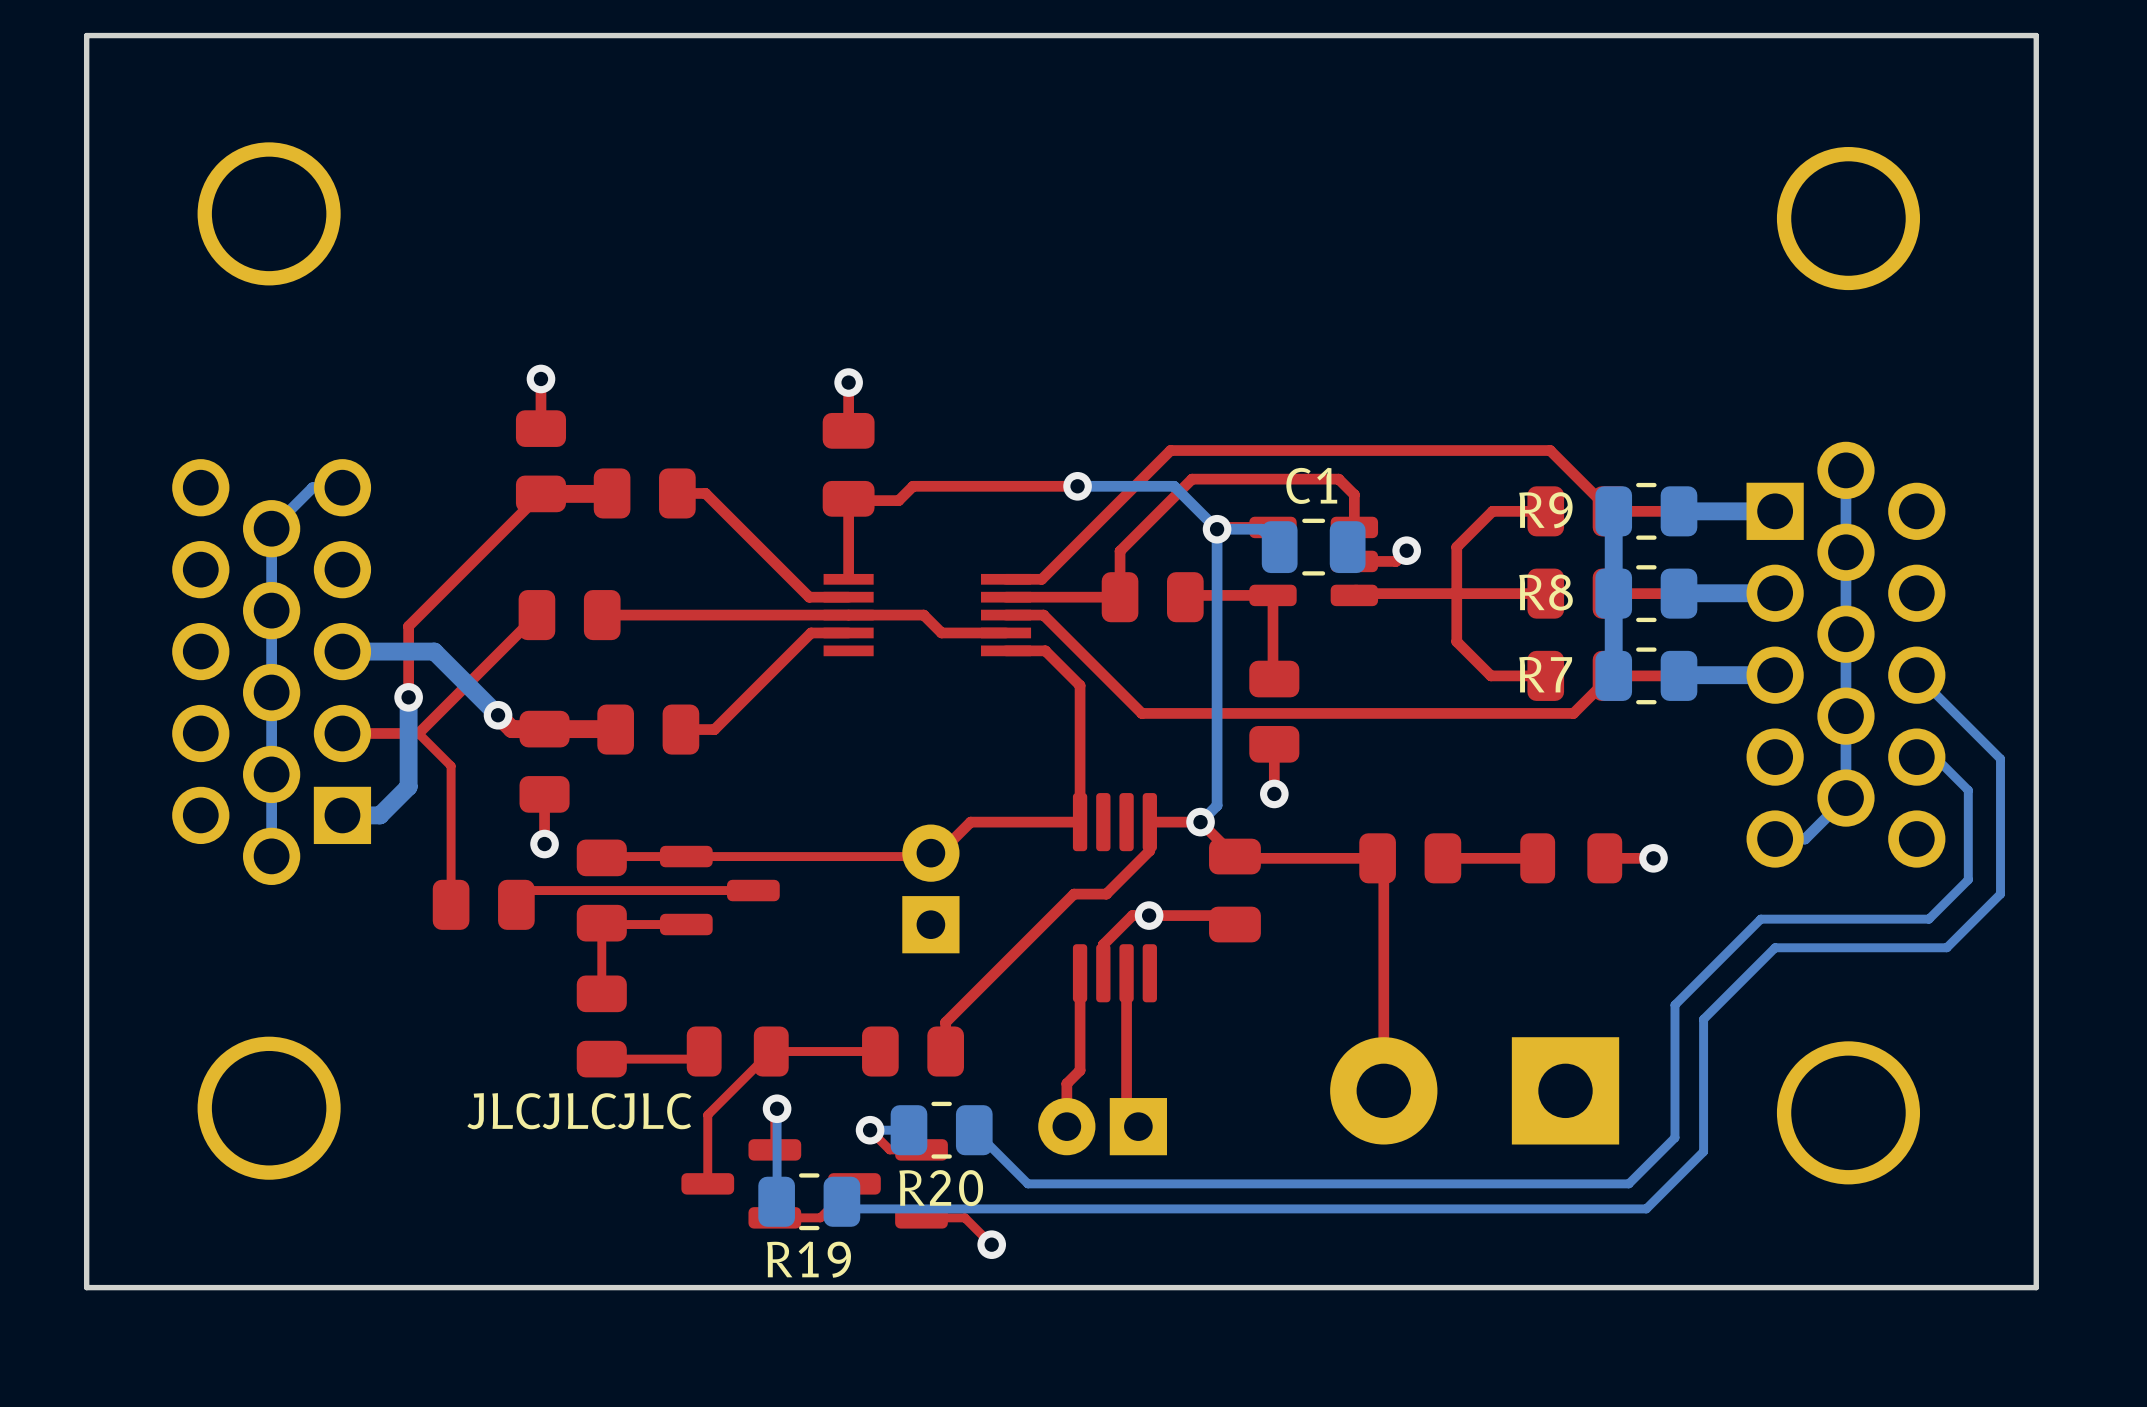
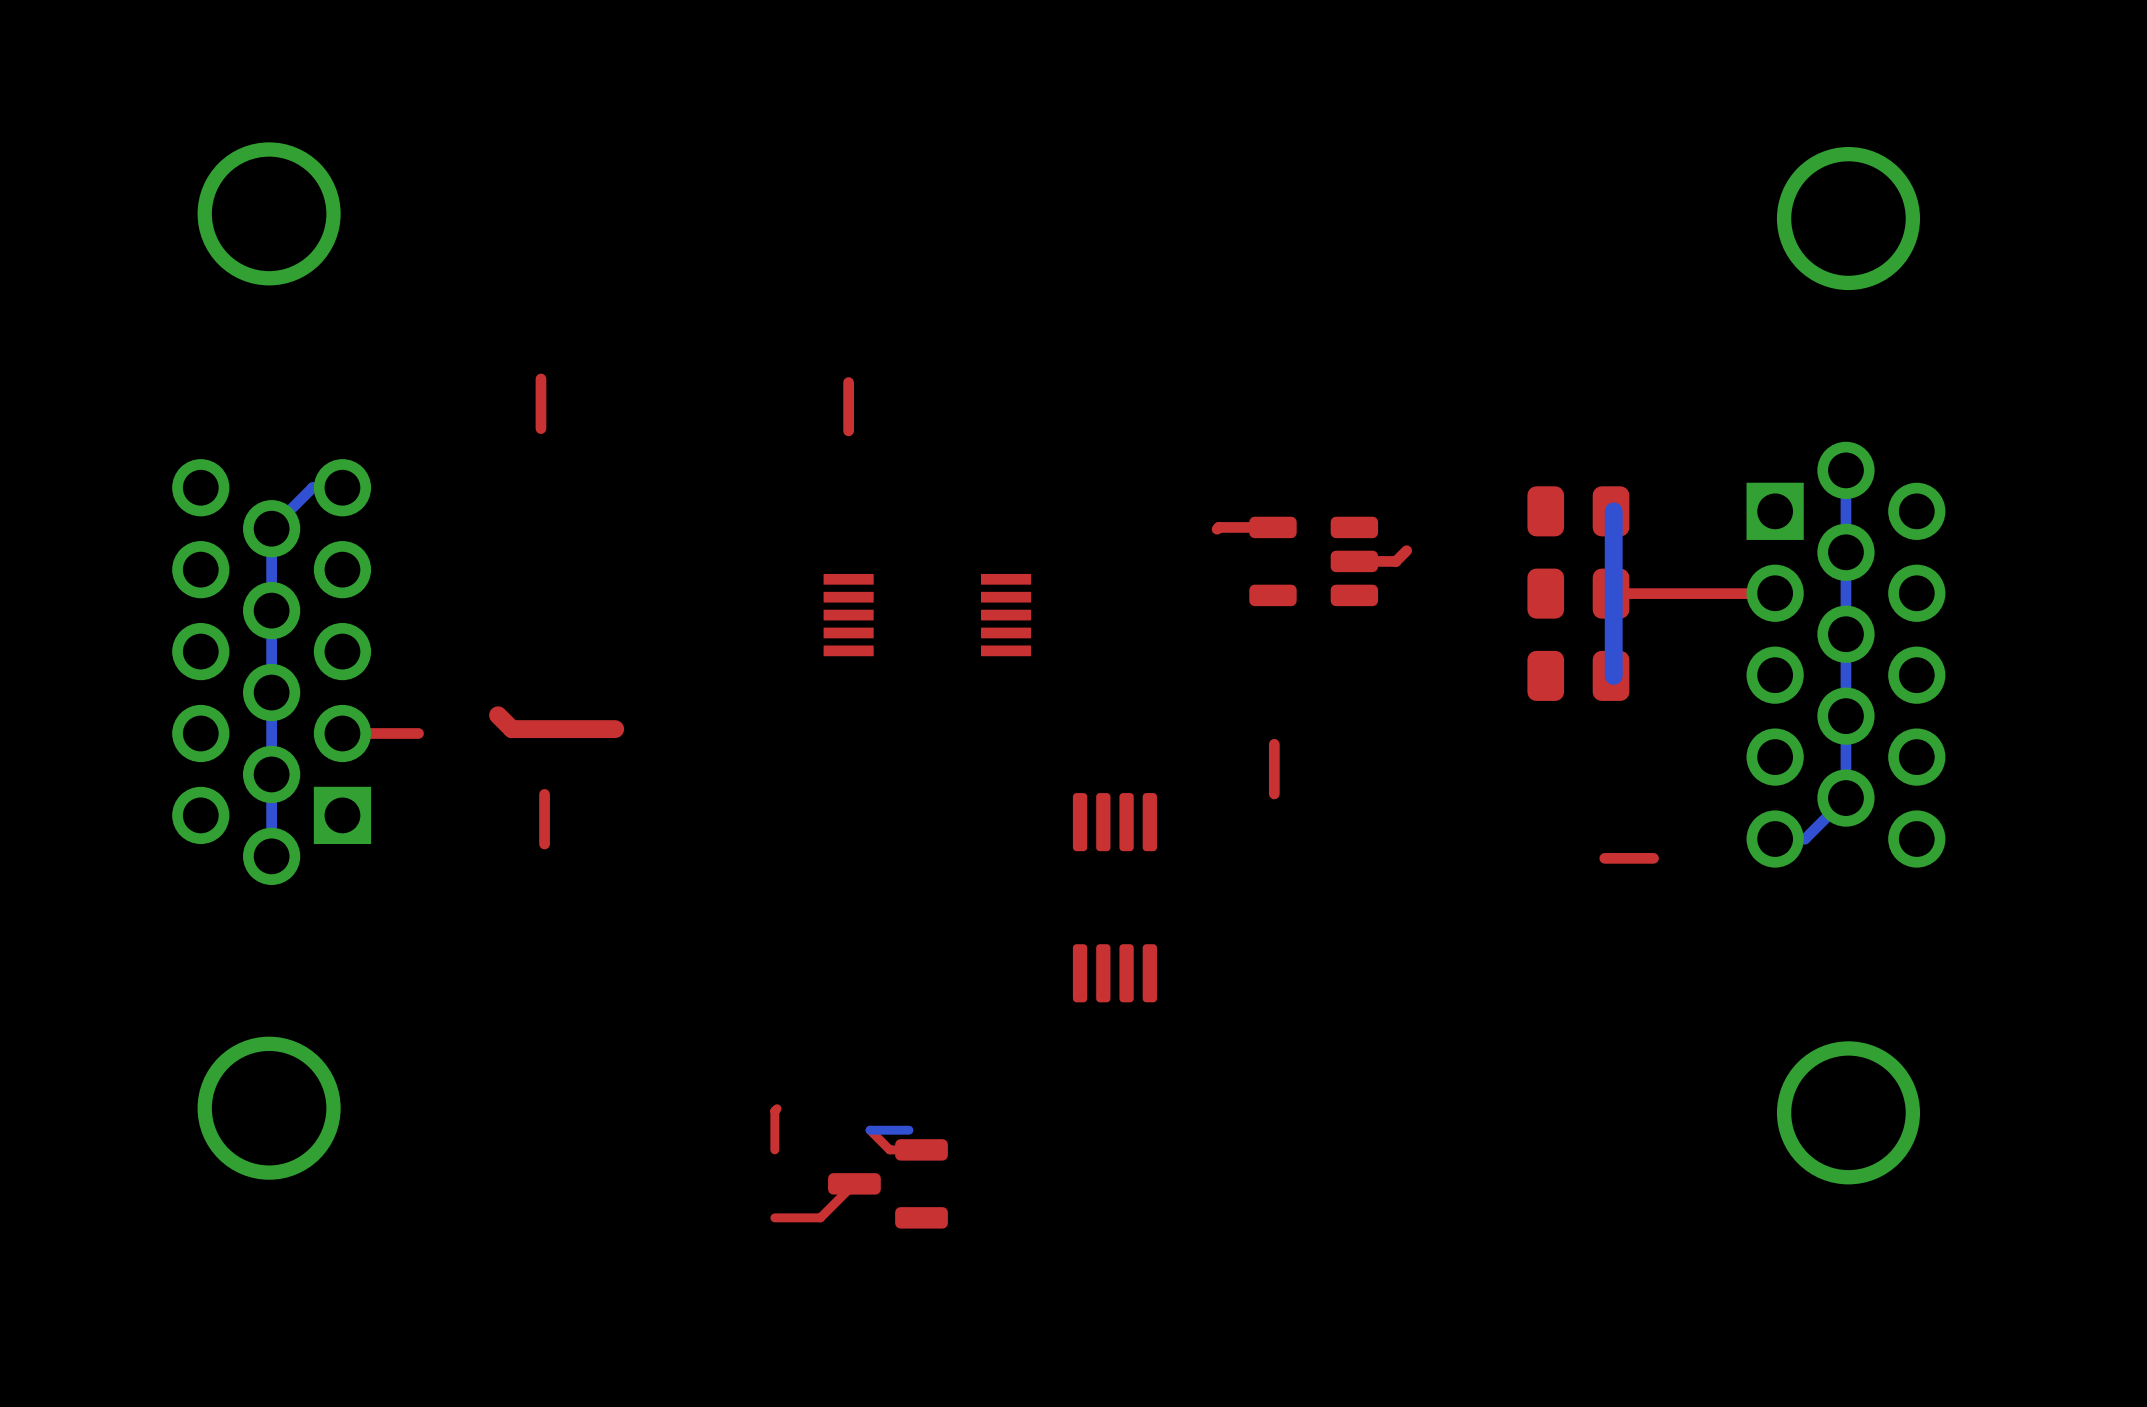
board edge: (2036, 35) (86, 35) (86, 1287) (2036, 1287) (2036, 35) -> none
via: (540, 378) -> none
via: (848, 382) -> none
part: (540, 461) -> none
part: (848, 464) -> none
top track: (1077, 486) (913, 486) (898, 500) (850, 500) (848, 498) (848, 575) -> none
bottom track: (1077, 486) (1174, 486) (1217, 529) -> none
via: (1077, 486) -> none
top track: (611, 493) (540, 493) (408, 626) (408, 697) -> none
part: (644, 493) -> none
top track: (677, 493) (705, 493) (809, 597) (848, 597) -> none
top track: (1545, 511) (1492, 511) (1456, 547) (1456, 641) (1490, 675) (1544, 675) -> none
R9: (1646, 511) -> none
top track: (1775, 511) (1611, 511) (1550, 450) (1170, 450) (1041, 579) (1006, 579) -> none
bottom track: (1775, 511) (1679, 511) -> none
top track: (1354, 527) (1354, 494) (1338, 479) (1192, 479) (1120, 551) (1120, 597) (1006, 597) -> none
bottom track: (1217, 529) (1217, 805) (1200, 822) -> none
bottom track: (1217, 529) (1261, 529) (1279, 547) -> none
via: (1217, 529) -> none
C1: (1313, 547) -> none
via: (1406, 550) -> none
top track: (1545, 593) (1356, 593) (1354, 595) -> none
R8: (1646, 593) -> none
bottom track: (1775, 593) (1679, 593) -> none
part: (1152, 597) -> none
top track: (1185, 597) (1187, 595) (1272, 595) (1274, 679) -> none
top track: (536, 615) (418, 733) (451, 766) (451, 904) -> none
part: (569, 615) -> none
top track: (602, 615) (923, 615) (941, 632) (1006, 632) -> none
top track: (1006, 615) (1043, 615) (1141, 713) (1573, 713) (1611, 675) (1774, 675) -> none
top track: (848, 632) (811, 632) (714, 729) (680, 729) -> none
top track: (1006, 650) (1045, 650) (1080, 685) (1080, 822) (970, 822) (939, 853) (930, 853) (927, 856) (601, 857) -> none
bottom track: (342, 651) (434, 651) (498, 715) -> none
R7: (1646, 675) -> none
bottom track: (1775, 675) (1679, 675) -> none
bottom track: (1916, 675) (2000, 758) (2000, 894) (1946, 947) (1775, 947) (1703, 1019) (1703, 1151) (1646, 1208) (849, 1208) (841, 1201) -> none
bottom track: (408, 697) (408, 786) (380, 815) (342, 815) -> none
via: (408, 697) -> none
part: (1274, 711) -> none
via: (498, 715) -> none
part: (648, 729) -> none
bottom track: (1916, 757) (1935, 757) (1968, 790) (1968, 879) (1928, 919) (1760, 919) (1674, 1005) (1674, 1137) (1628, 1183) (1027, 1183) (974, 1130) -> none
part: (544, 761) -> none
via: (1274, 793) -> none
via: (1200, 822) -> none
via: (544, 844) -> none
part: (1410, 858) -> none
top track: (1537, 858) (1442, 858) -> none
part: (1571, 858) -> none
via: (1653, 858) -> none
part: (930, 888) -> none
part: (601, 890) -> none
part: (719, 890) -> none
top track: (753, 890) (530, 890) (516, 904) -> none
part: (1234, 890) -> none
part: (483, 904) -> none
via: (1149, 915) -> none
top track: (686, 924) (601, 923) (601, 993) -> none
top track: (1234, 924) (1226, 915) (1132, 915) (1103, 944) (1103, 973) -> none
top track: (1080, 973) (1080, 1070) (1066, 1083) (1066, 1126) -> none
top track: (1126, 973) (1126, 1114) (1138, 1126) -> none
part: (601, 1026) -> none
top track: (704, 1051) (696, 1059) (601, 1059) -> none
part: (737, 1051) -> none
top track: (880, 1051) (771, 1051) (707, 1115) (707, 1183) -> none
part: (913, 1051) -> none
top track: (945, 1051) (945, 1022) (1073, 894) (1106, 894) (1149, 850) (1149, 822) (1200, 822) (1236, 858) (1377, 858) (1383, 864) (1383, 1090) -> none
part: (1474, 1090) -> none
bottom track: (777, 1108) (777, 1201) -> none
via: (777, 1108) -> none
text: JLCJLCJLC (579, 1111) -> none
part: (1102, 1126) -> none
via: (870, 1130) -> none
R20: (941, 1130) -> none
part: (741, 1183) -> none
R19: (809, 1201) -> none
top track: (921, 1217) (964, 1217) (991, 1244) -> none
via: (991, 1244) -> none

